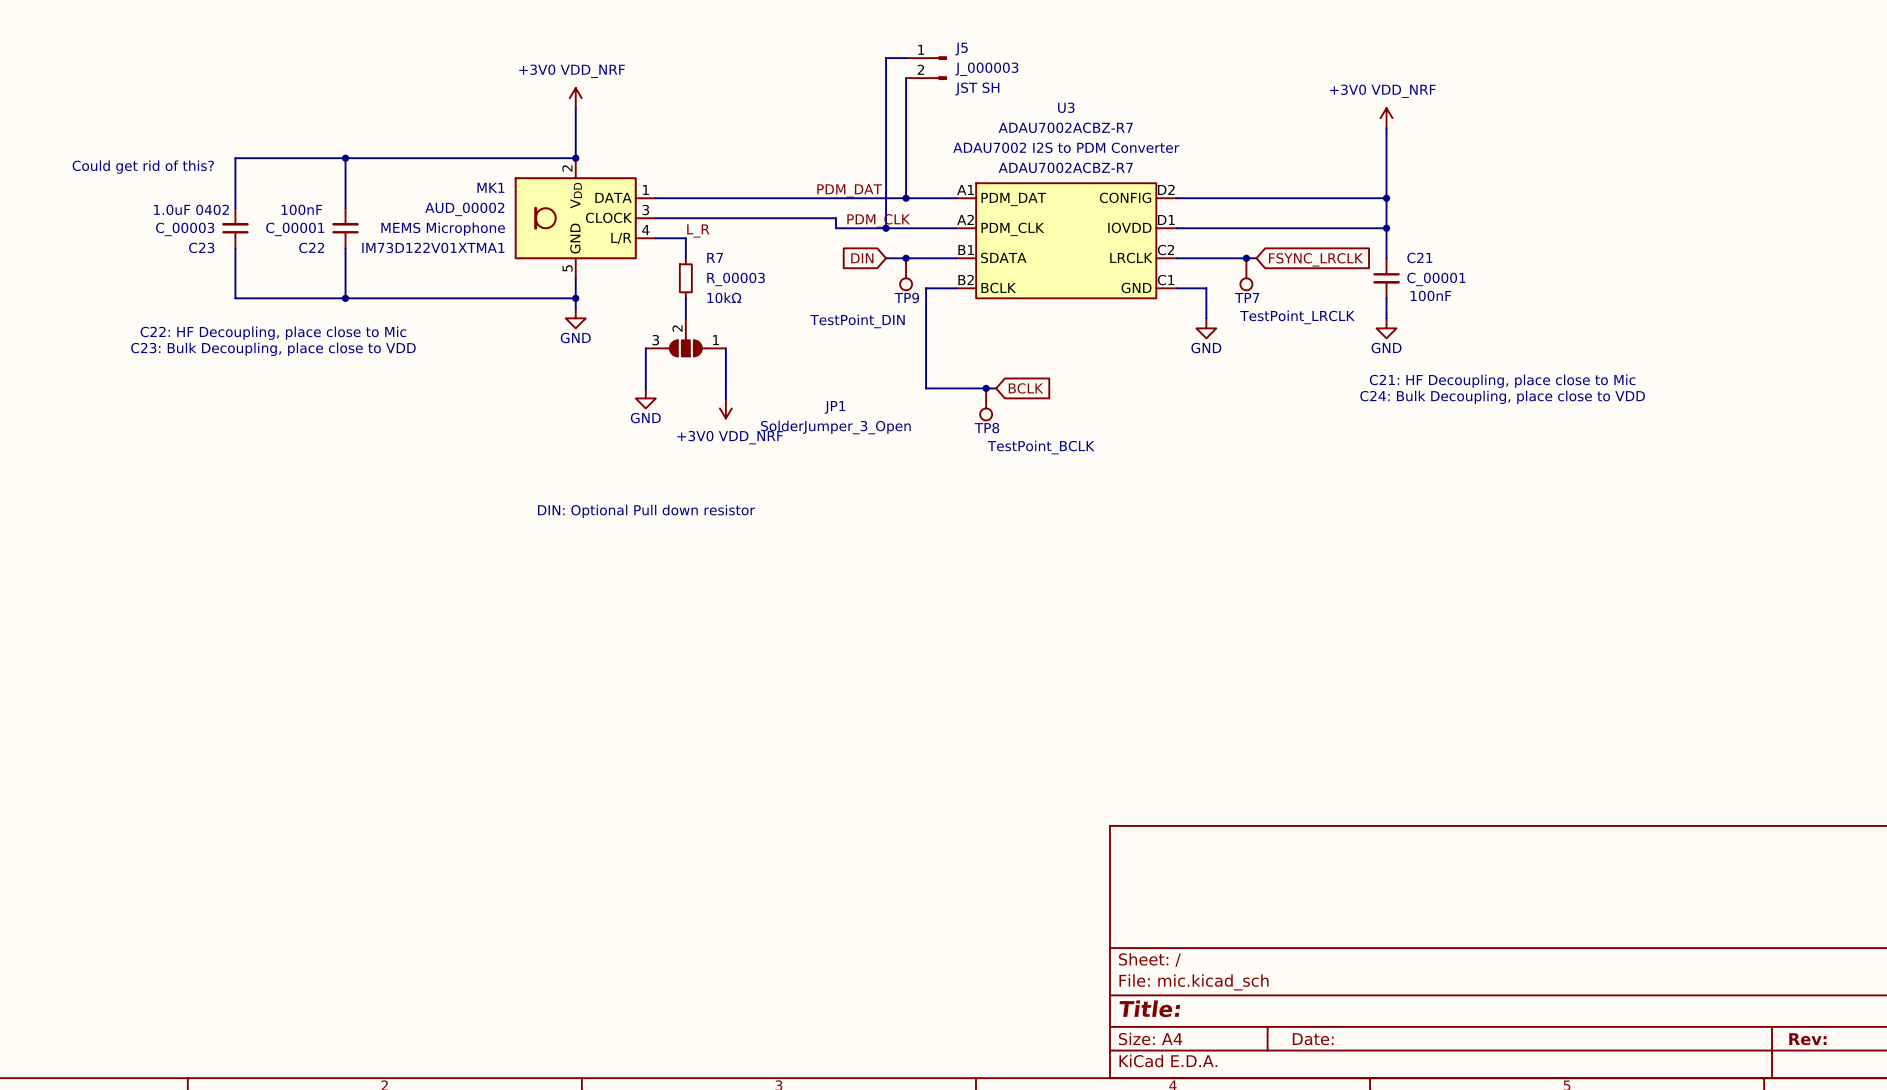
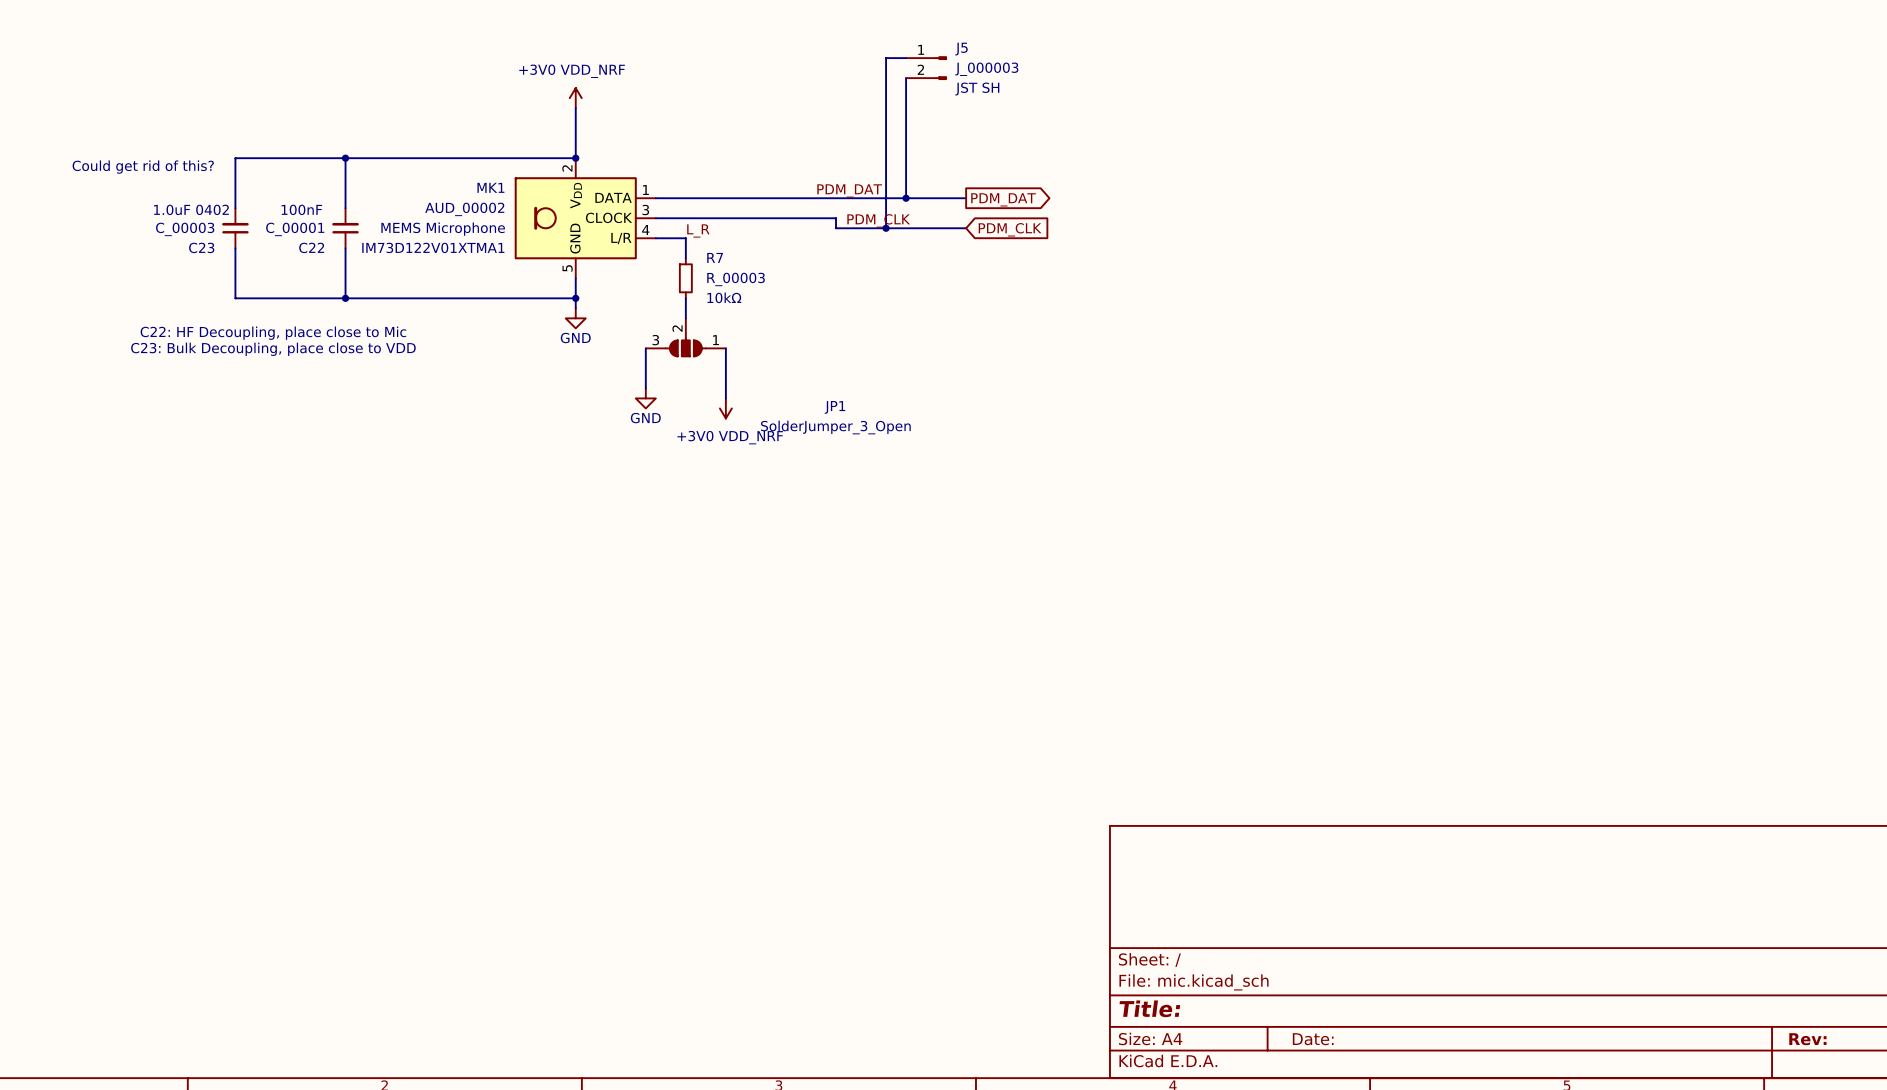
power symbol: +3V0 VDD_NRF (1386, 118) -> none
wire: (1386, 128) (1386, 258) -> none
wire: (1176, 198) (1386, 198) -> none
junction: (1386, 198) -> none
global label: none -> PDM_DAT (1003, 199)
wire: (1176, 228) (1386, 228) -> none
junction: (1386, 228) -> none
global label: none -> PDM_CLK (1010, 229)
U3: ADAU7002ACBZ-R7 (1066, 240) -> none
global label: DIN (862, 258) -> none
wire: (886, 258) (956, 258) -> none
junction: (906, 258) -> none
wire: (1176, 258) (1256, 258) -> none
junction: (1246, 258) -> none
global label: FSYNC_LRCLK (1316, 259) -> none
TP9: TestPoint_DIN (906, 274) -> none
TP7: TestPoint_LRCLK (1246, 274) -> none
C21: C_00001 (1386, 278) -> none
wire: (956, 288) (926, 288) (926, 388) (996, 388) -> none
wire: (1176, 288) (1206, 288) (1206, 318) -> none
wire: (1386, 298) (1386, 318) -> none
power symbol: GND (1206, 328) -> none
power symbol: GND (1386, 328) -> none
text: C21: HF Decoupling, place close to Mic (1502, 381) -> none
junction: (986, 388) -> none
global label: BCLK (1026, 388) -> none
text: C24: Bulk Decoupling, place close to VDD (1502, 397) -> none
TP8: TestPoint_BCLK (986, 404) -> none
text: DIN: Optional Pull down resistor (646, 511) -> none

